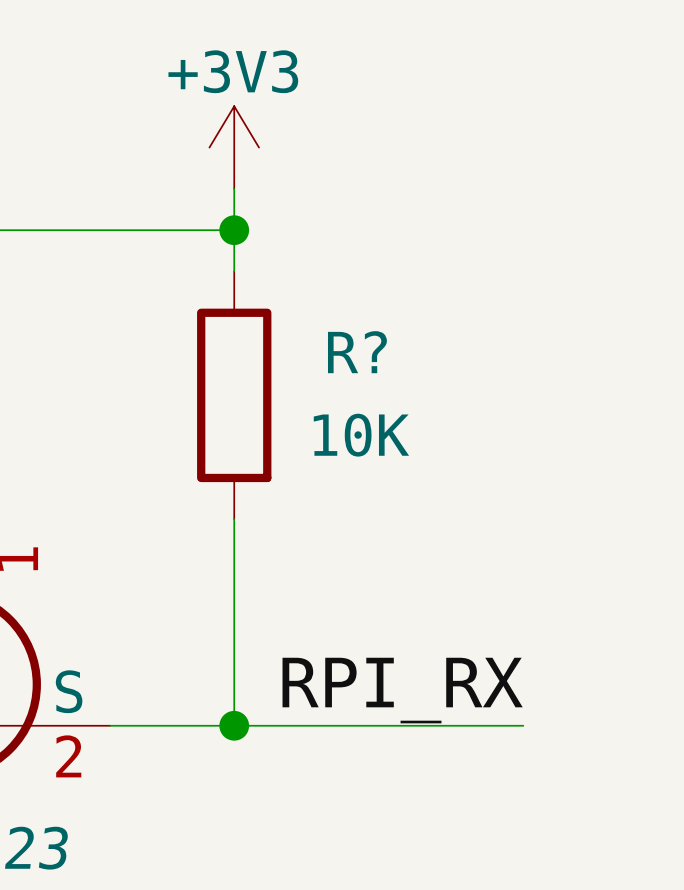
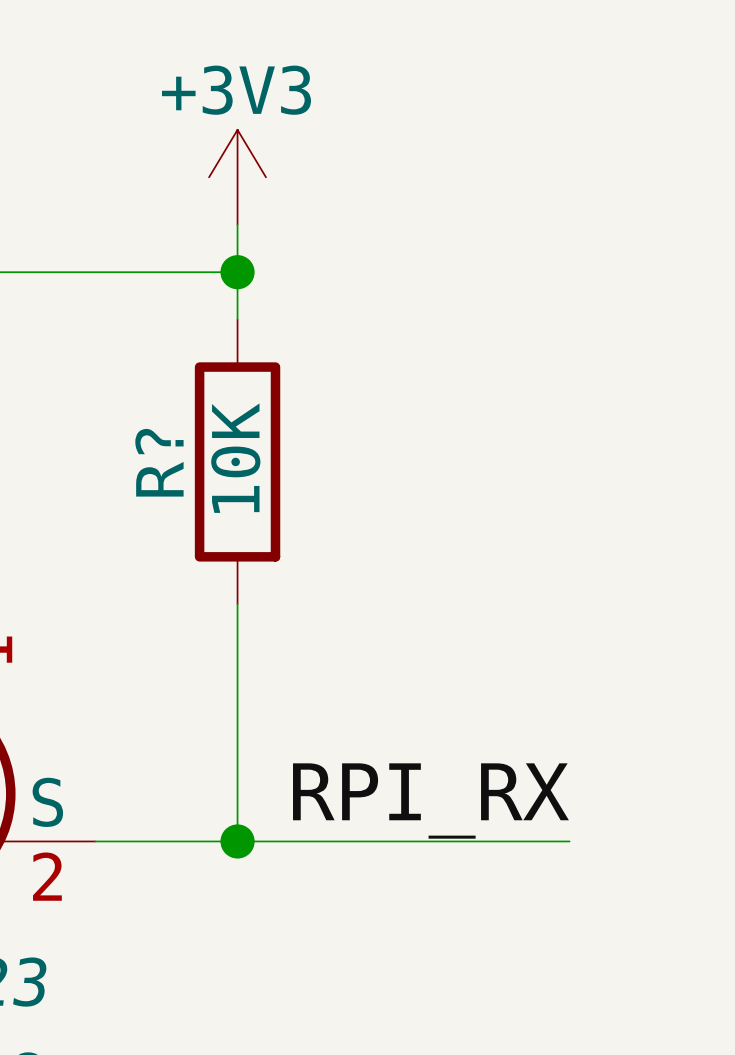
R? name rotation: 0° (357, 352) -> 90° counterclockwise (159, 462)
R? name position: R? (357, 352) -> R? (159, 462)
R? value rotation: 0° (361, 435) -> 90° counterclockwise (235, 458)

